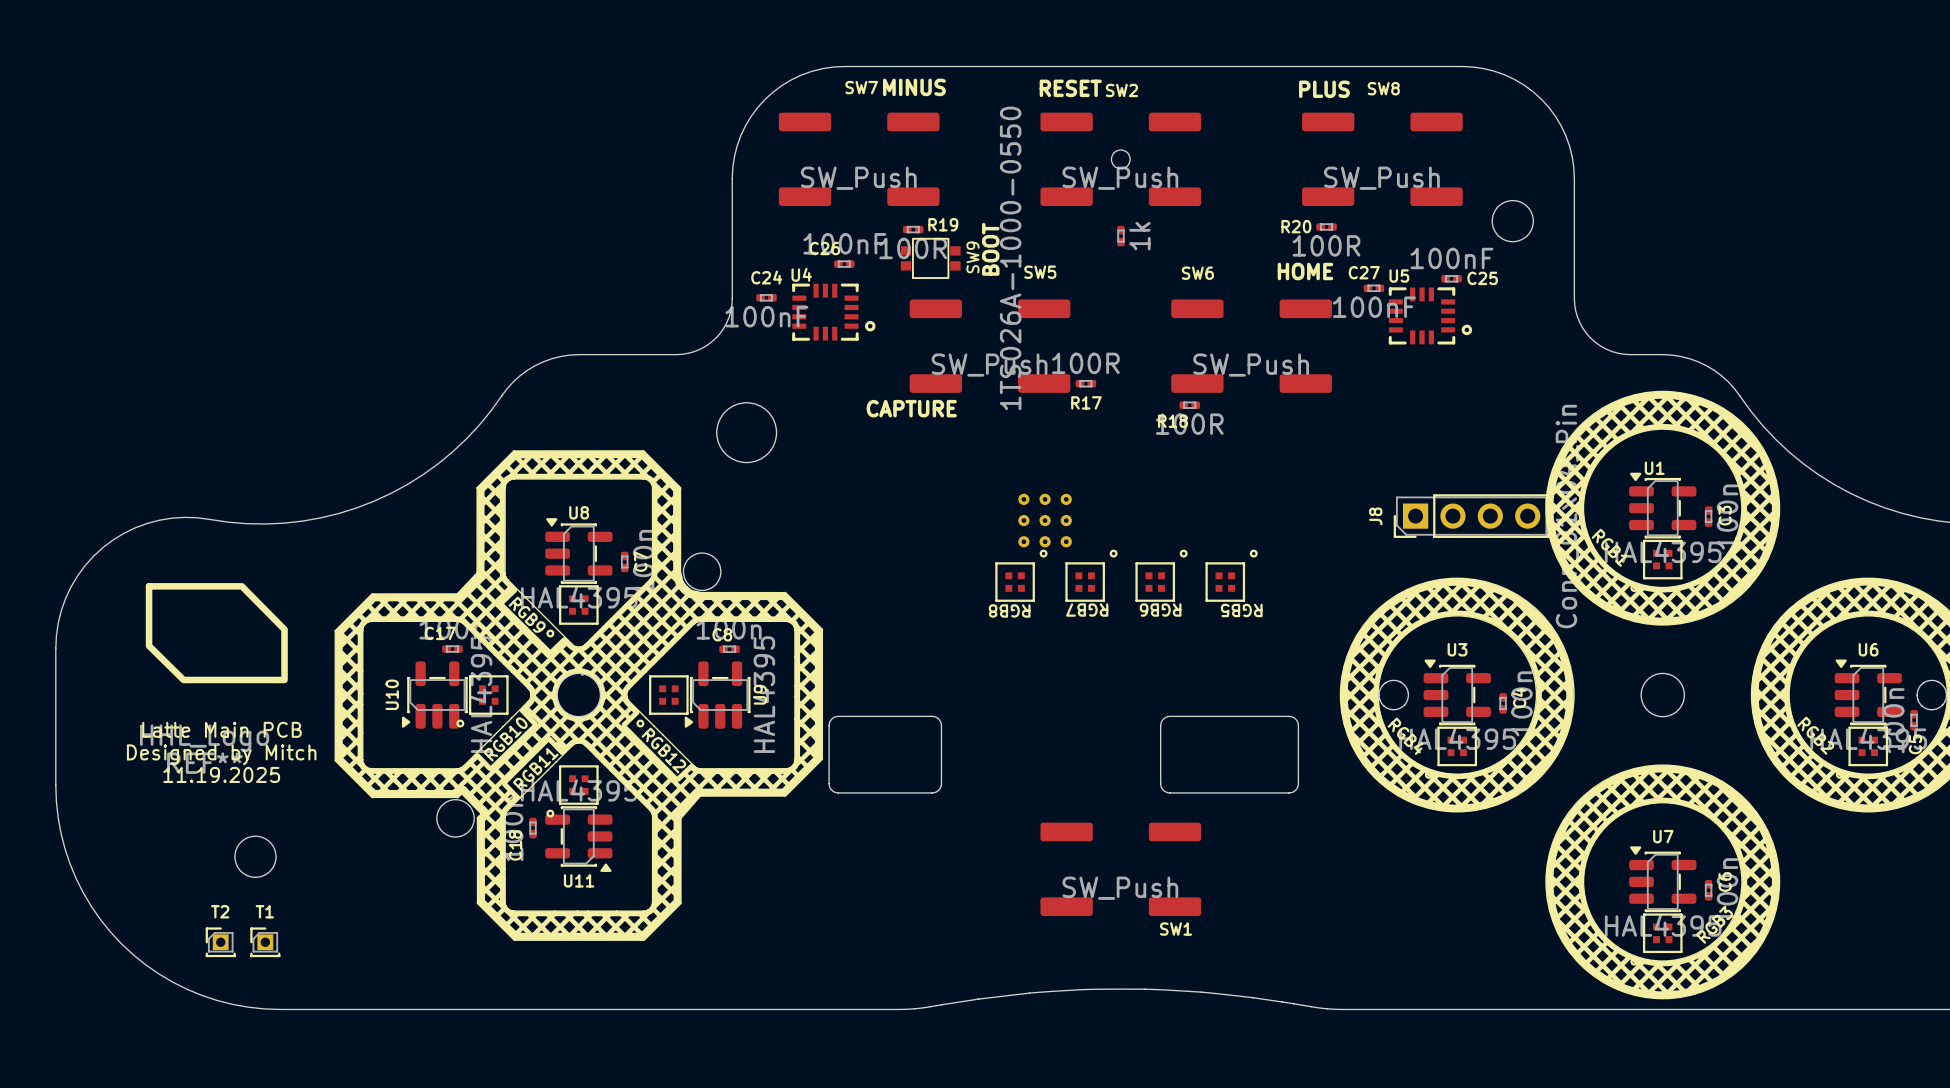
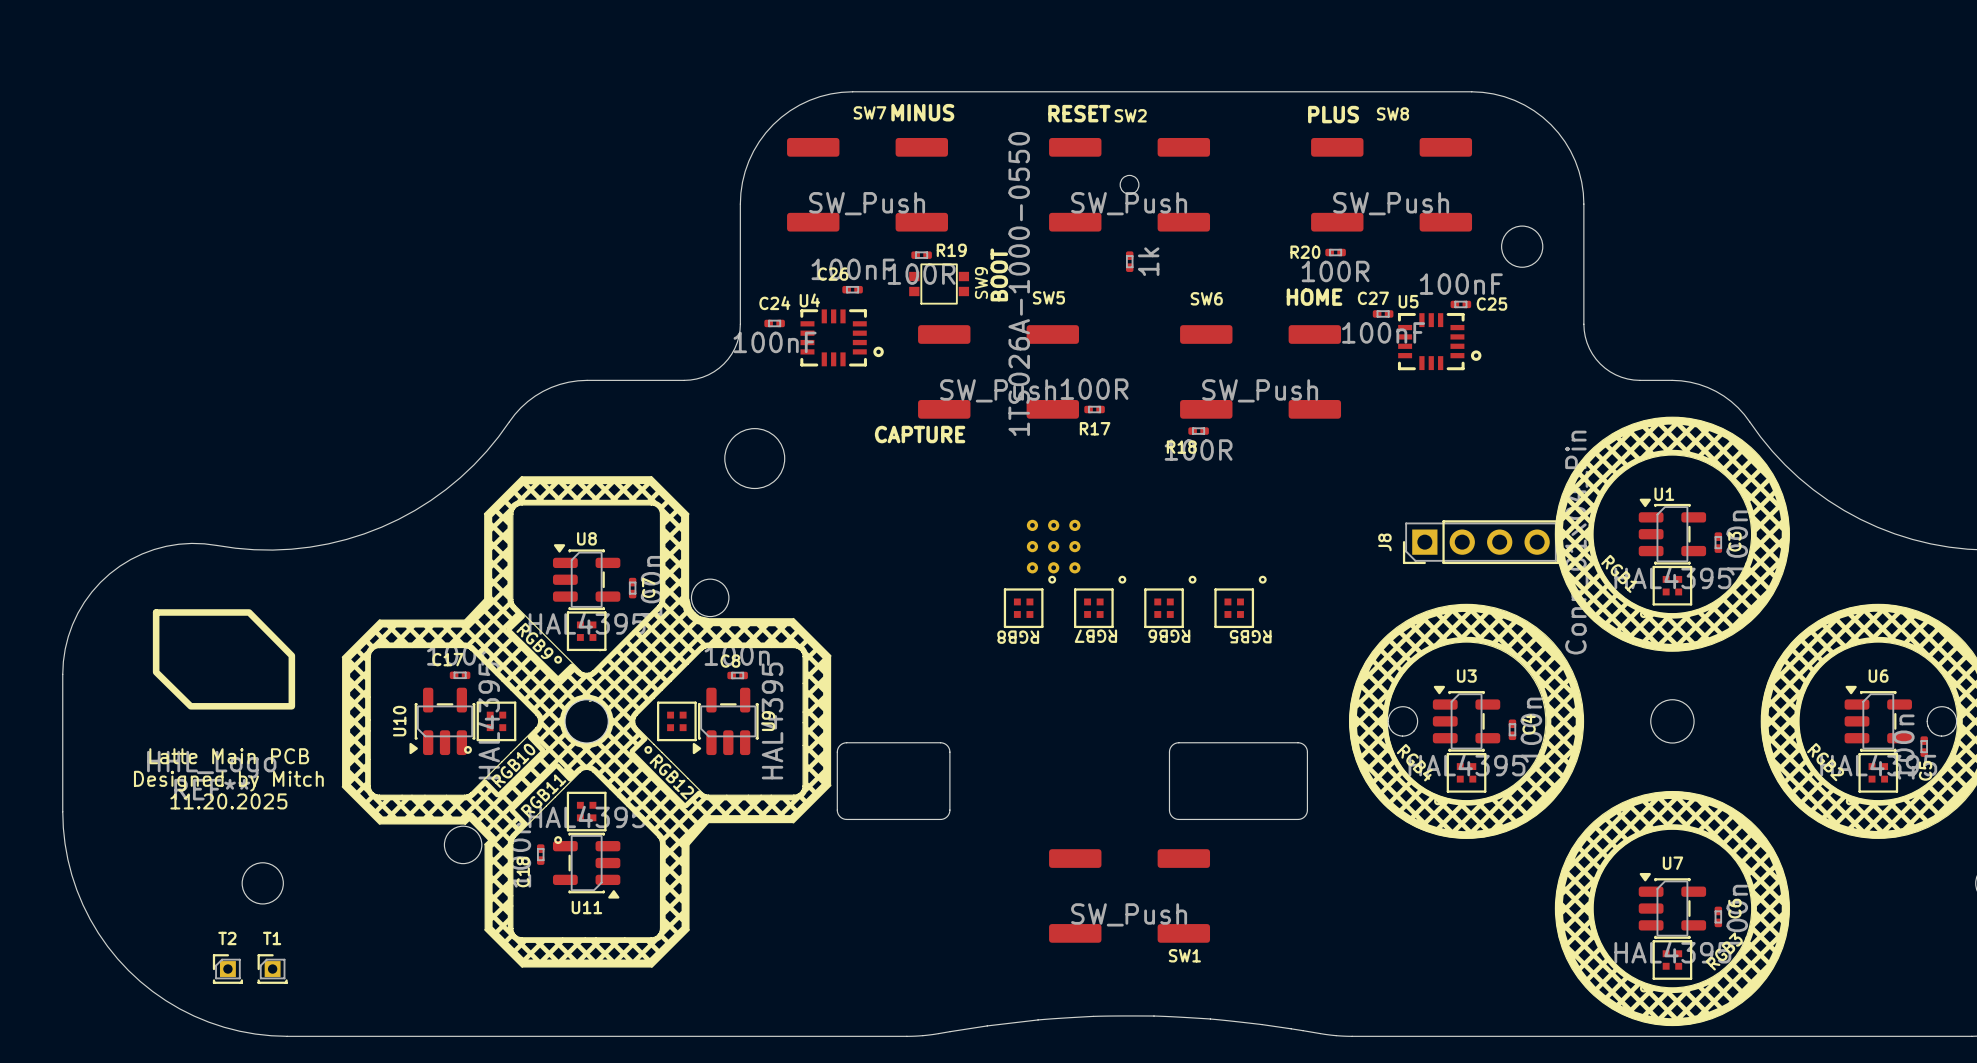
text: 11.19.2025 (221, 774) -> 11.20.2025 (228, 801)

